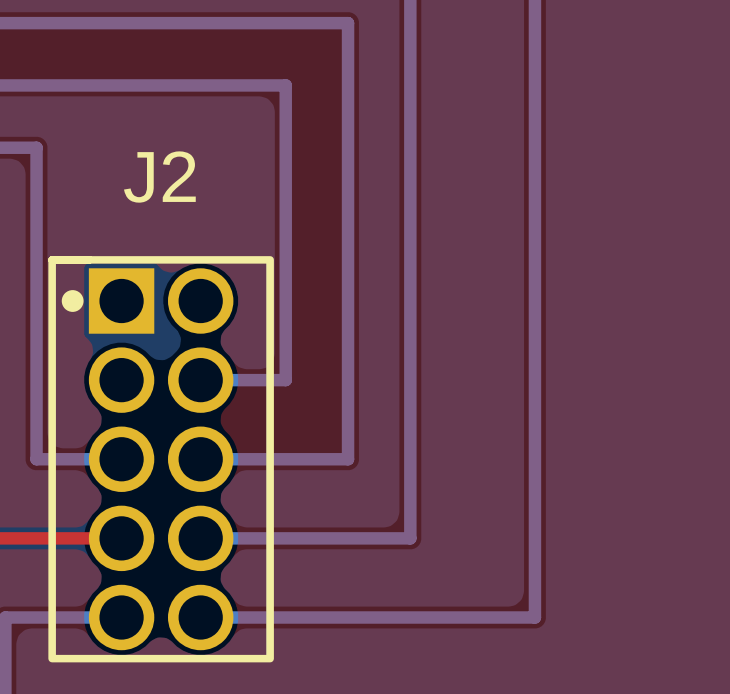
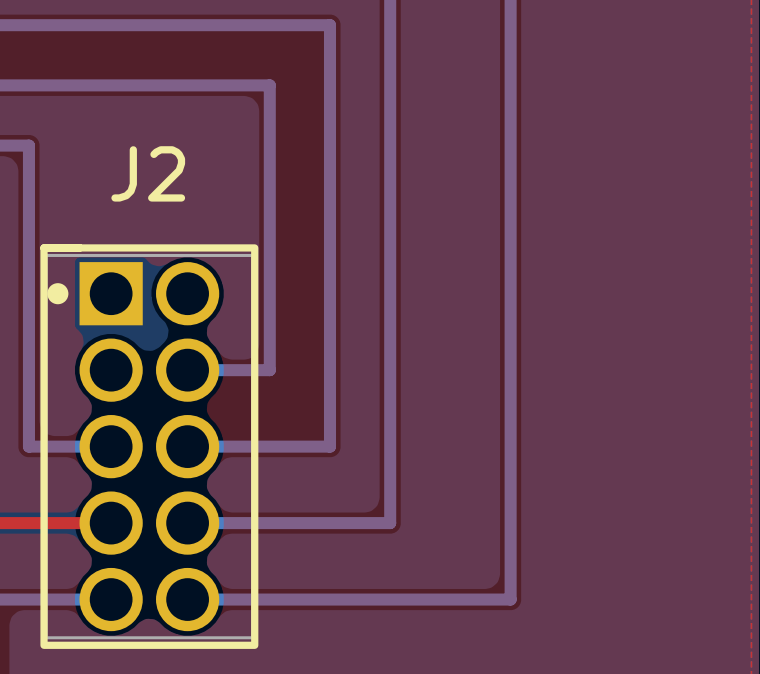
J2 footprint: [48, 256, 274, 663] -> [40, 244, 259, 649]

